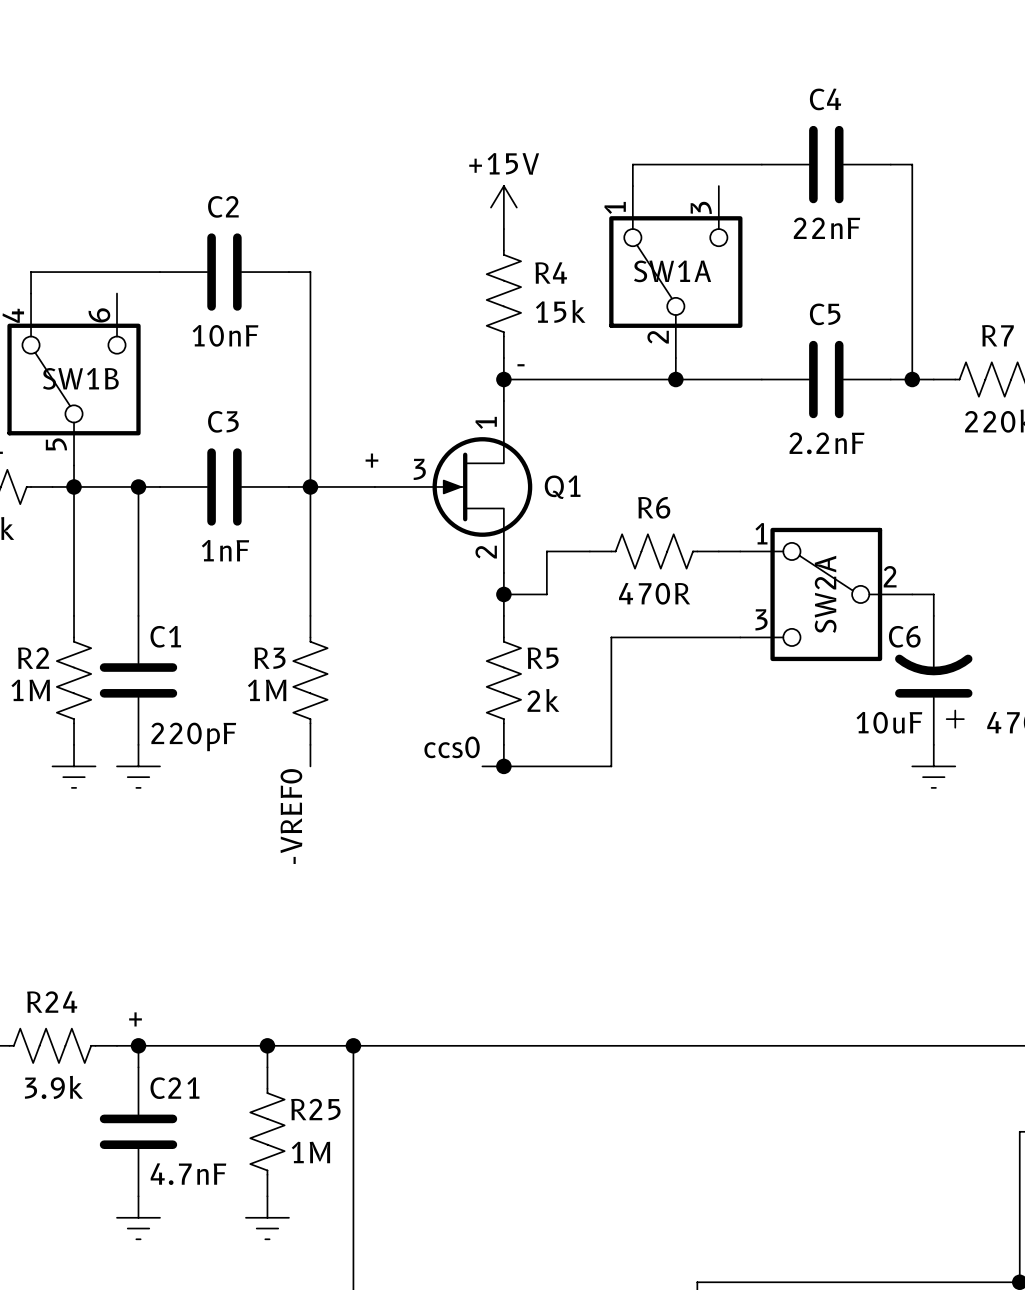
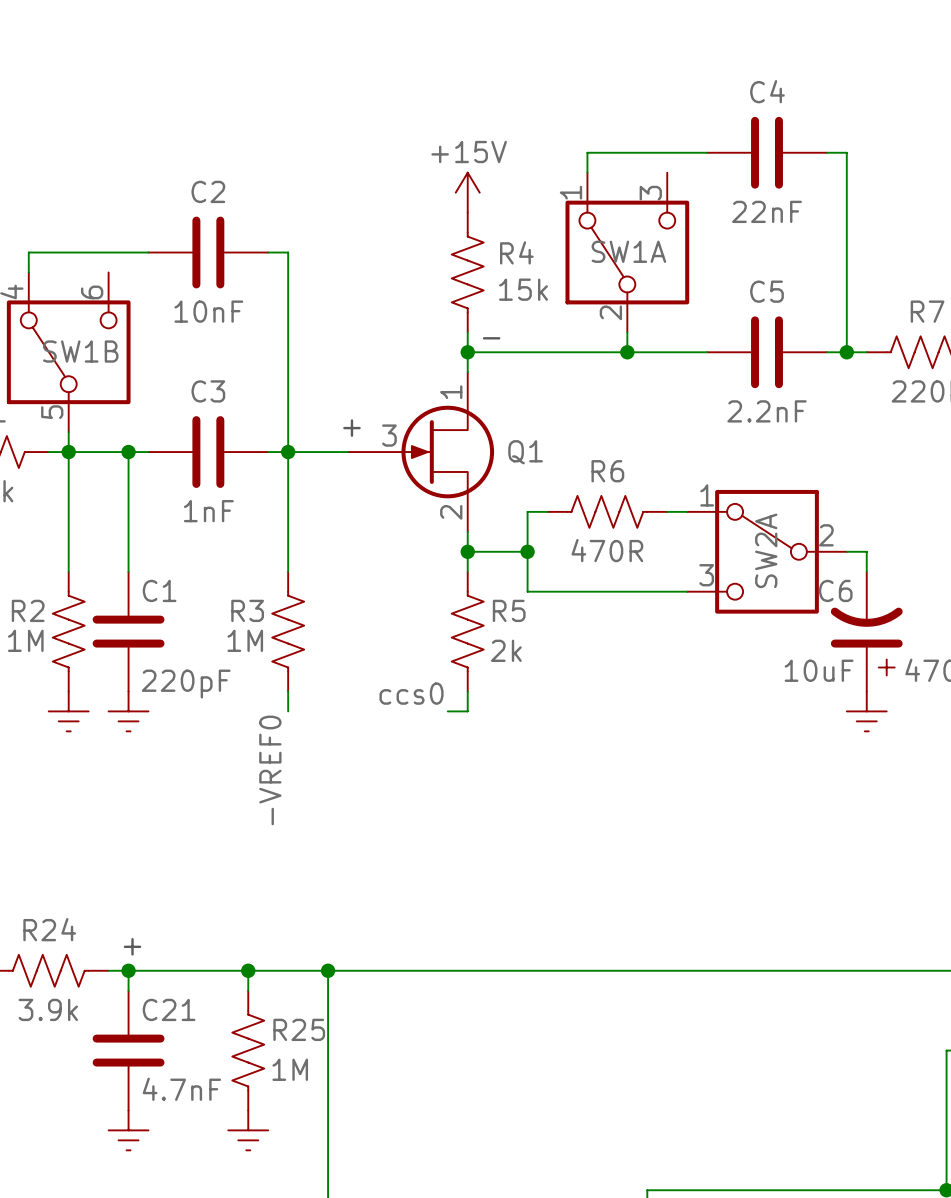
wire: (568, 551) (546, 551) (546, 594) -> (527, 551) (507, 551)
junction: none -> (527, 551)
wire: (611, 637) (611, 766) (503, 766) -> (567, 591) (527, 591) (527, 511)
junction: (503, 766) -> none

